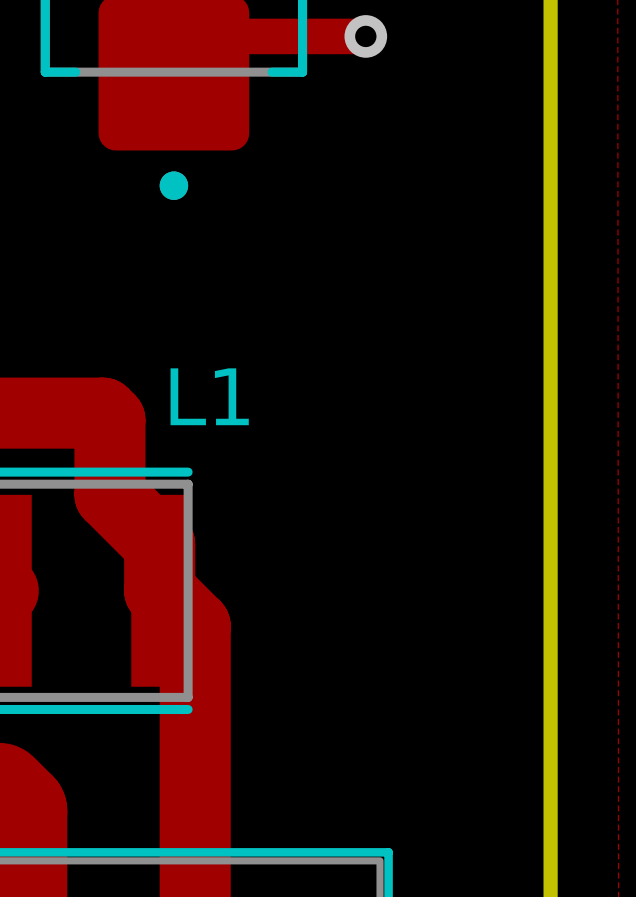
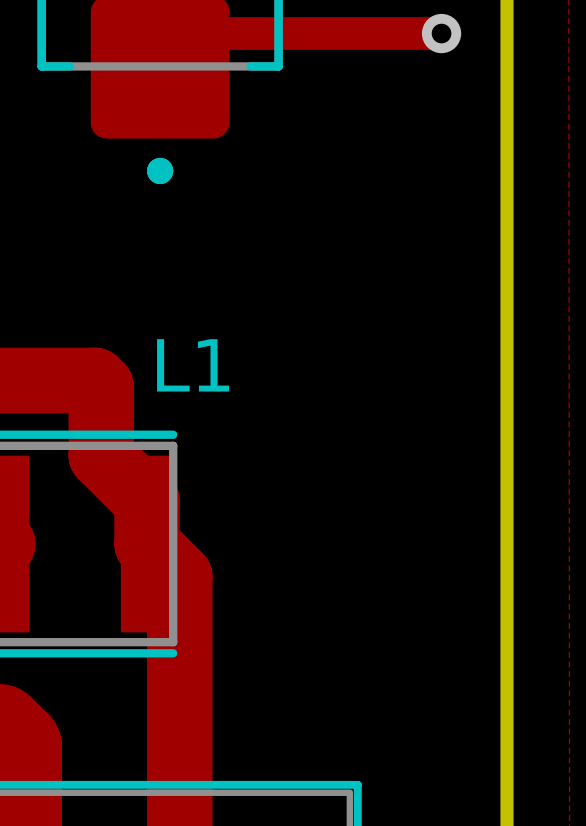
track: none -> (336, 33) (441, 33)
via position: (365, 36) -> (441, 33)

